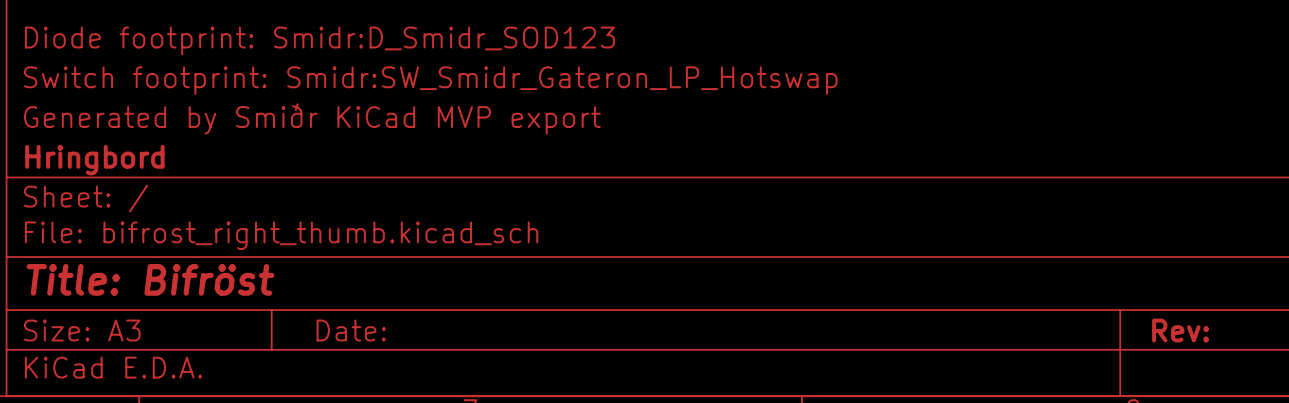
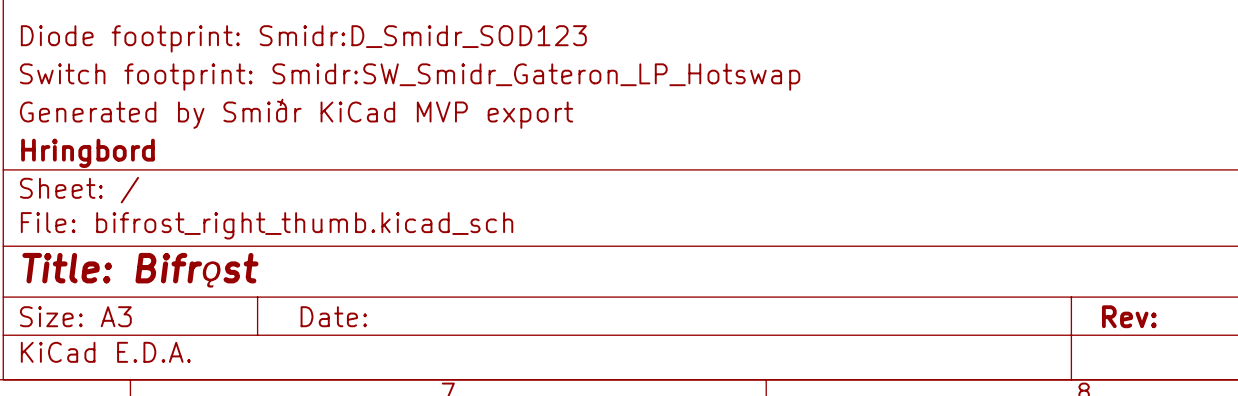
title block: Title: Bifröst (150, 279) -> Title: Bifrǫst (140, 271)

